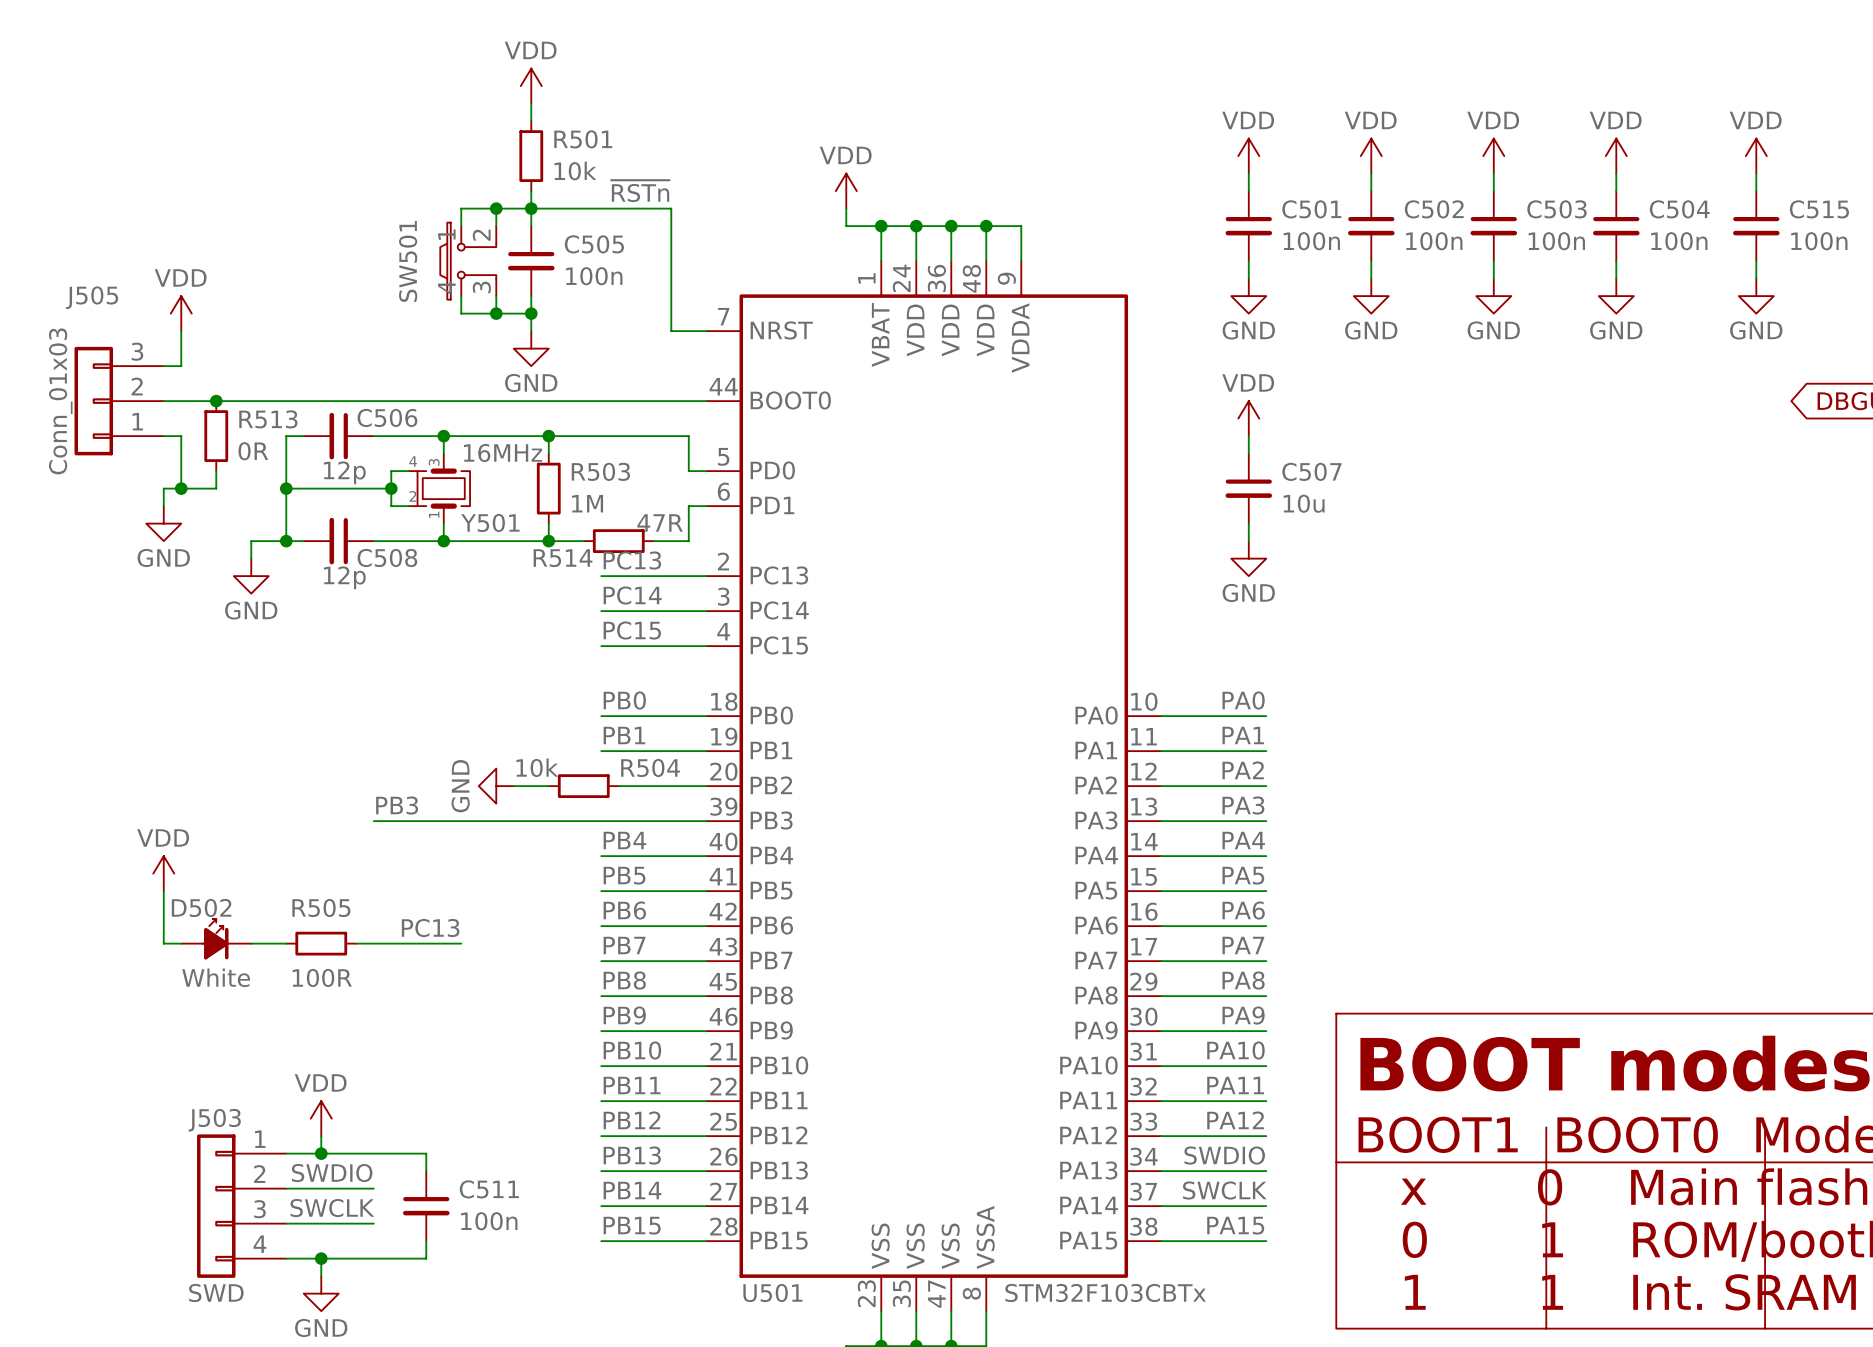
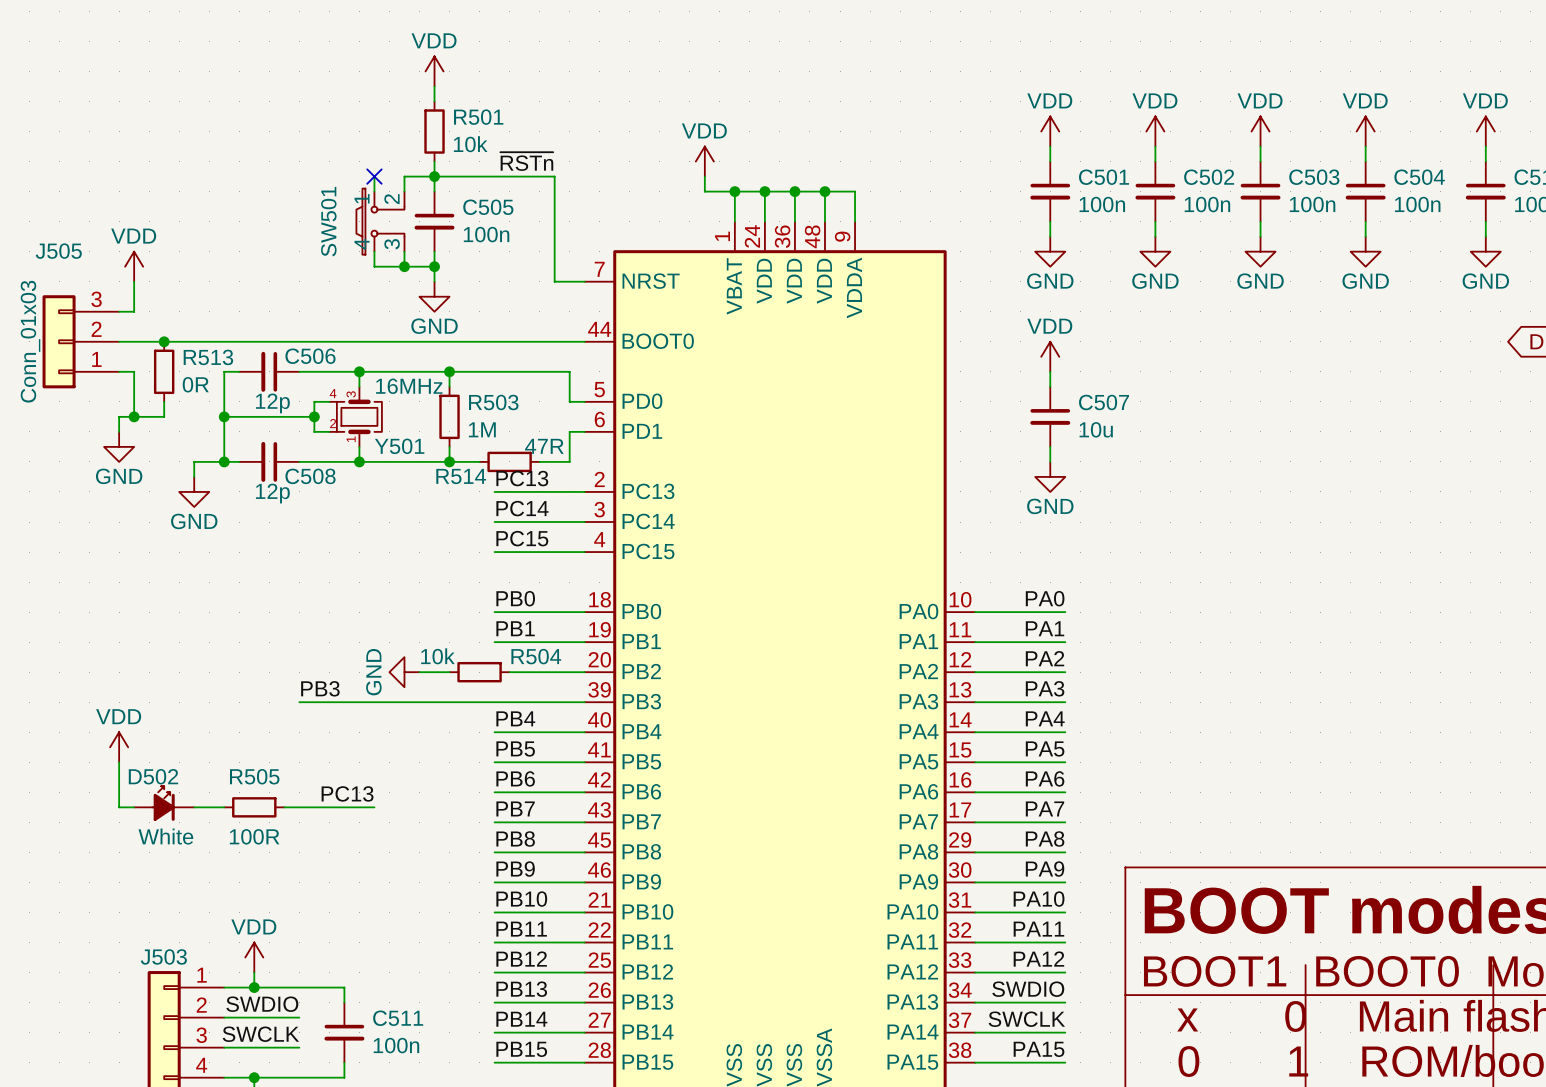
wire: (461, 208) (496, 208) -> none
no-connect mark: none -> (374, 176)
junction: (496, 208) -> none

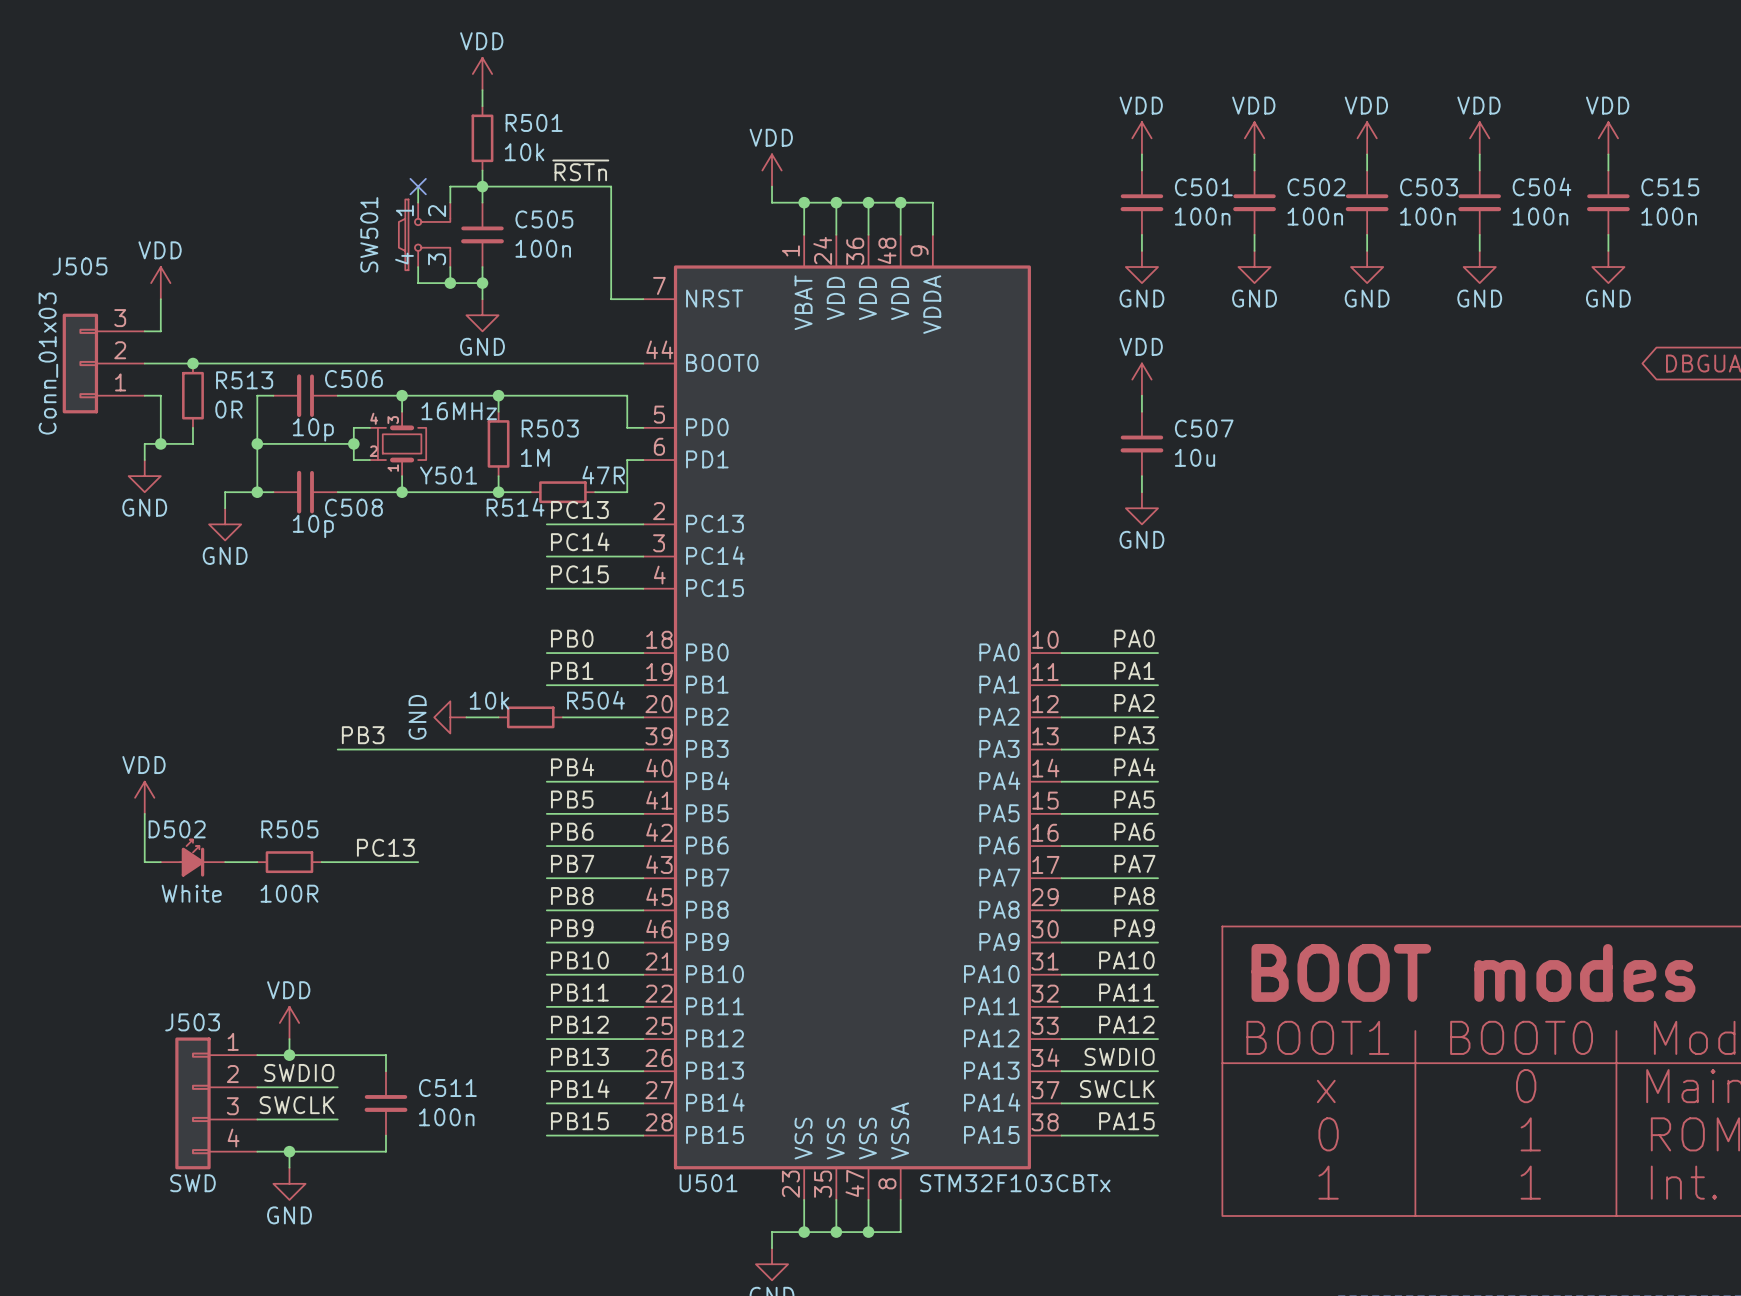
C506 value: 12p (272, 403) -> 10p (313, 429)
C508 value: 12p (272, 493) -> 10p (313, 526)

